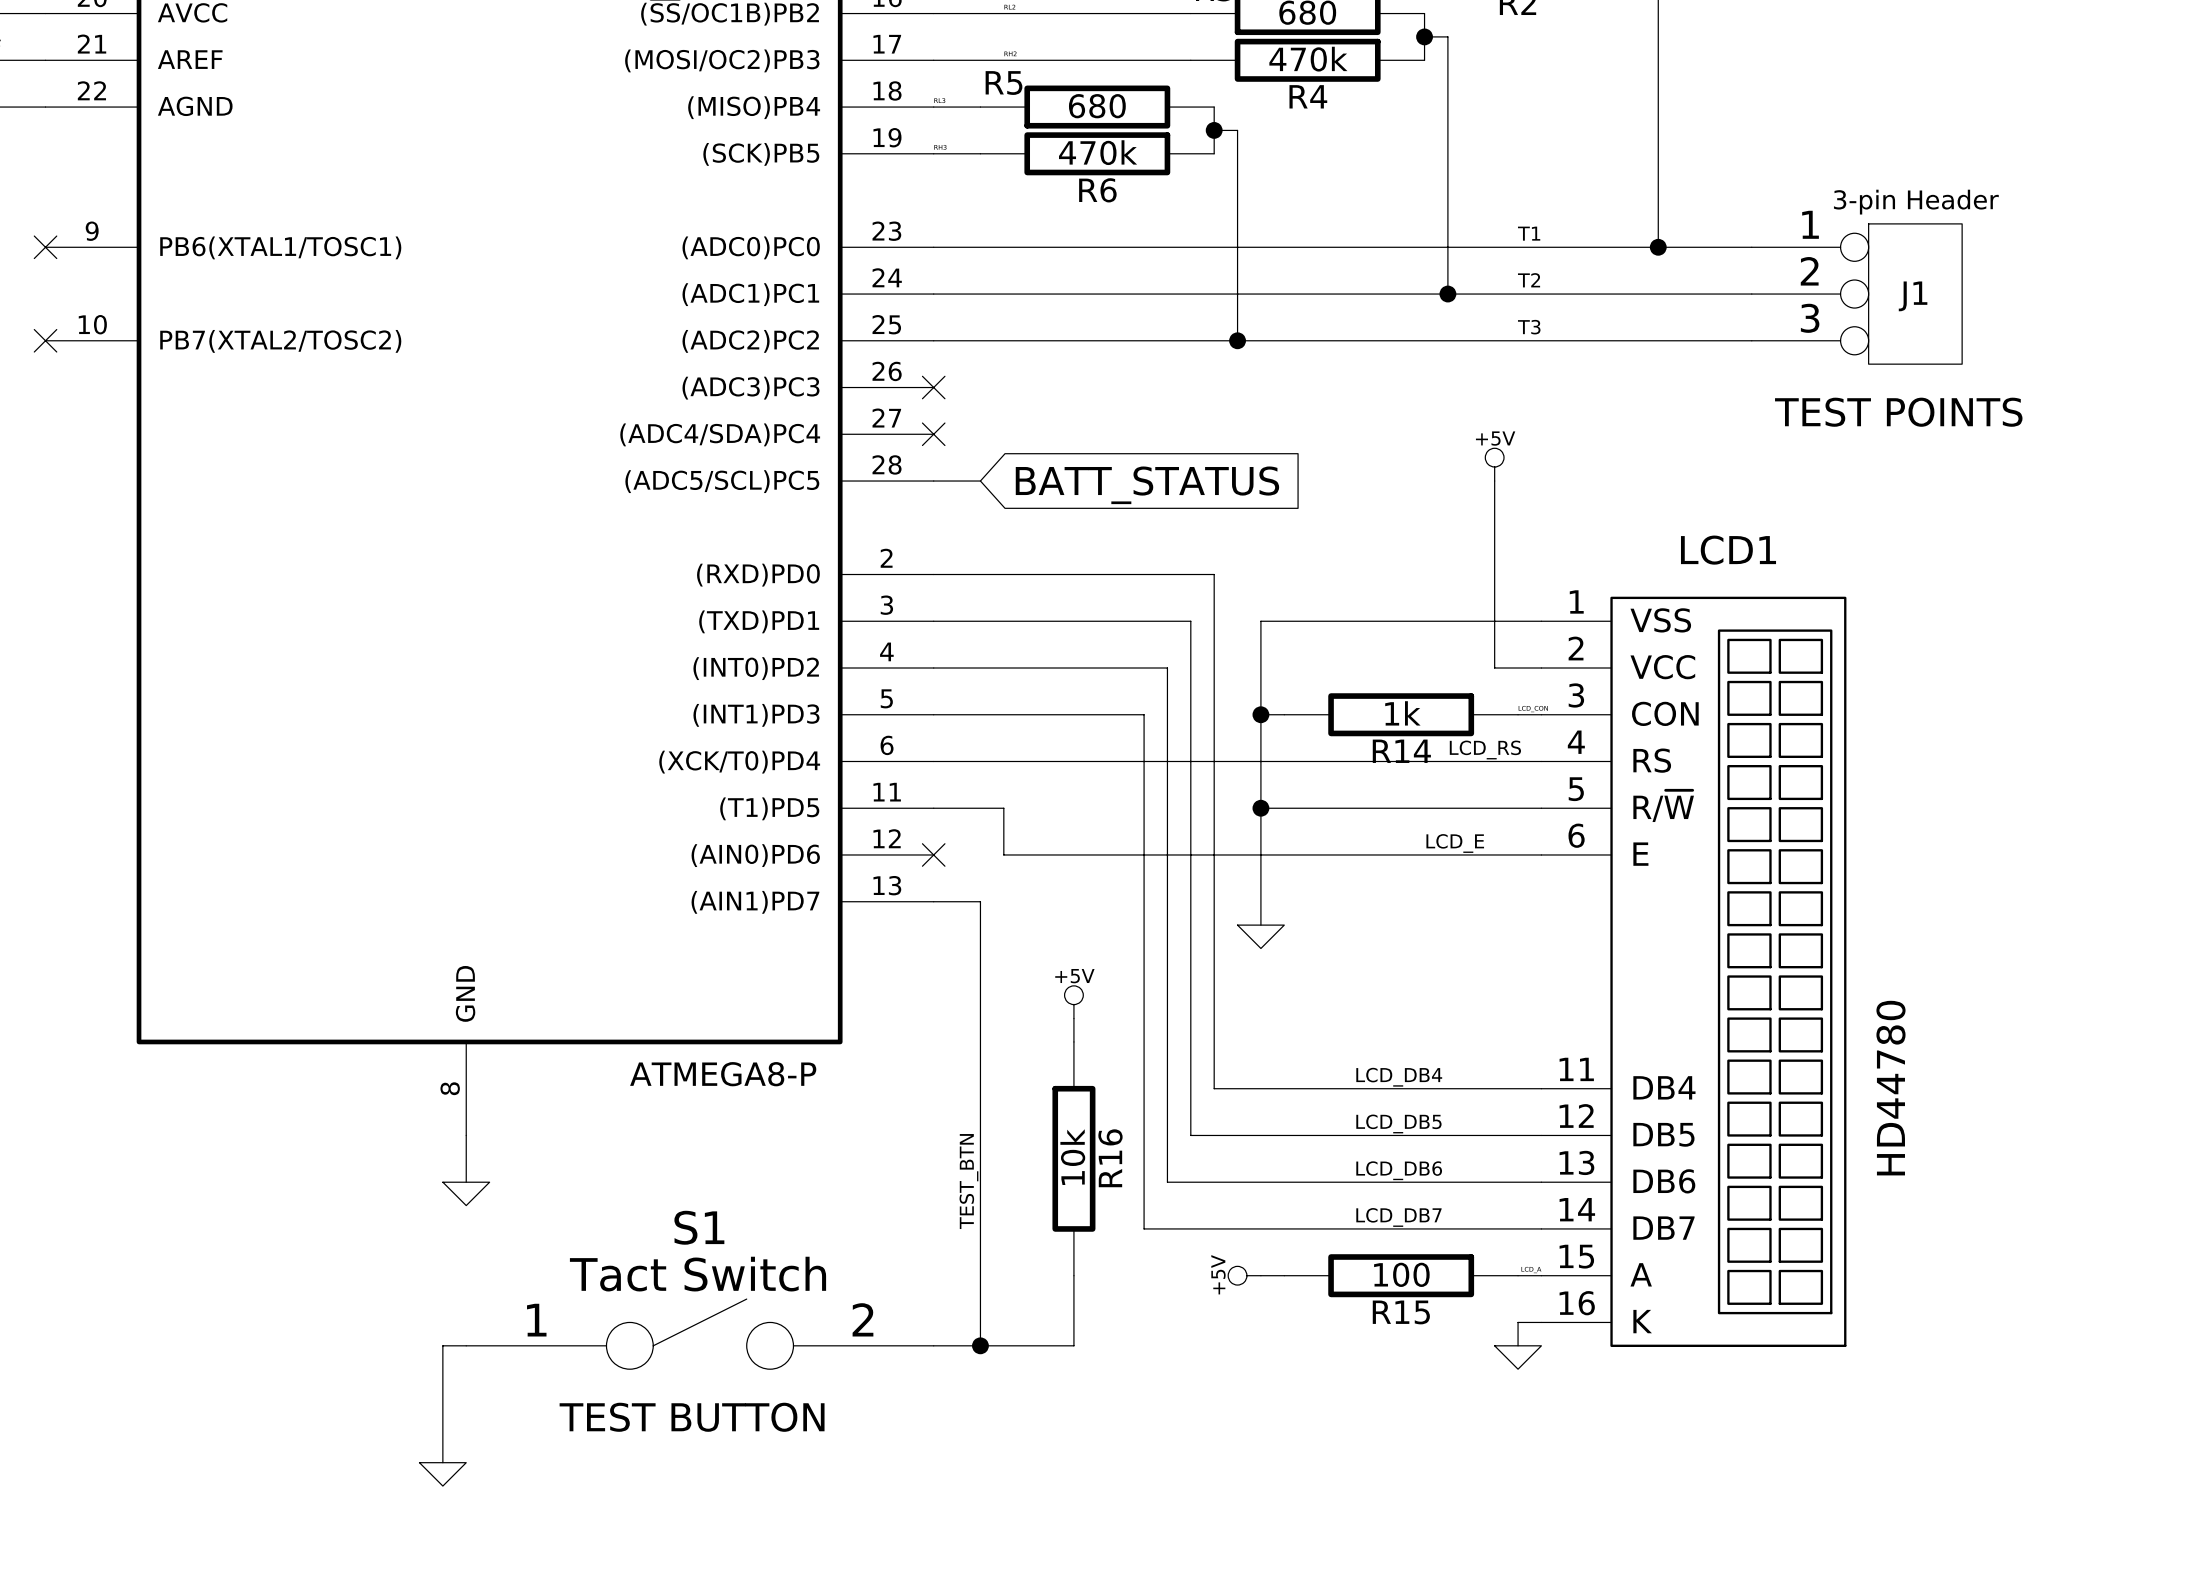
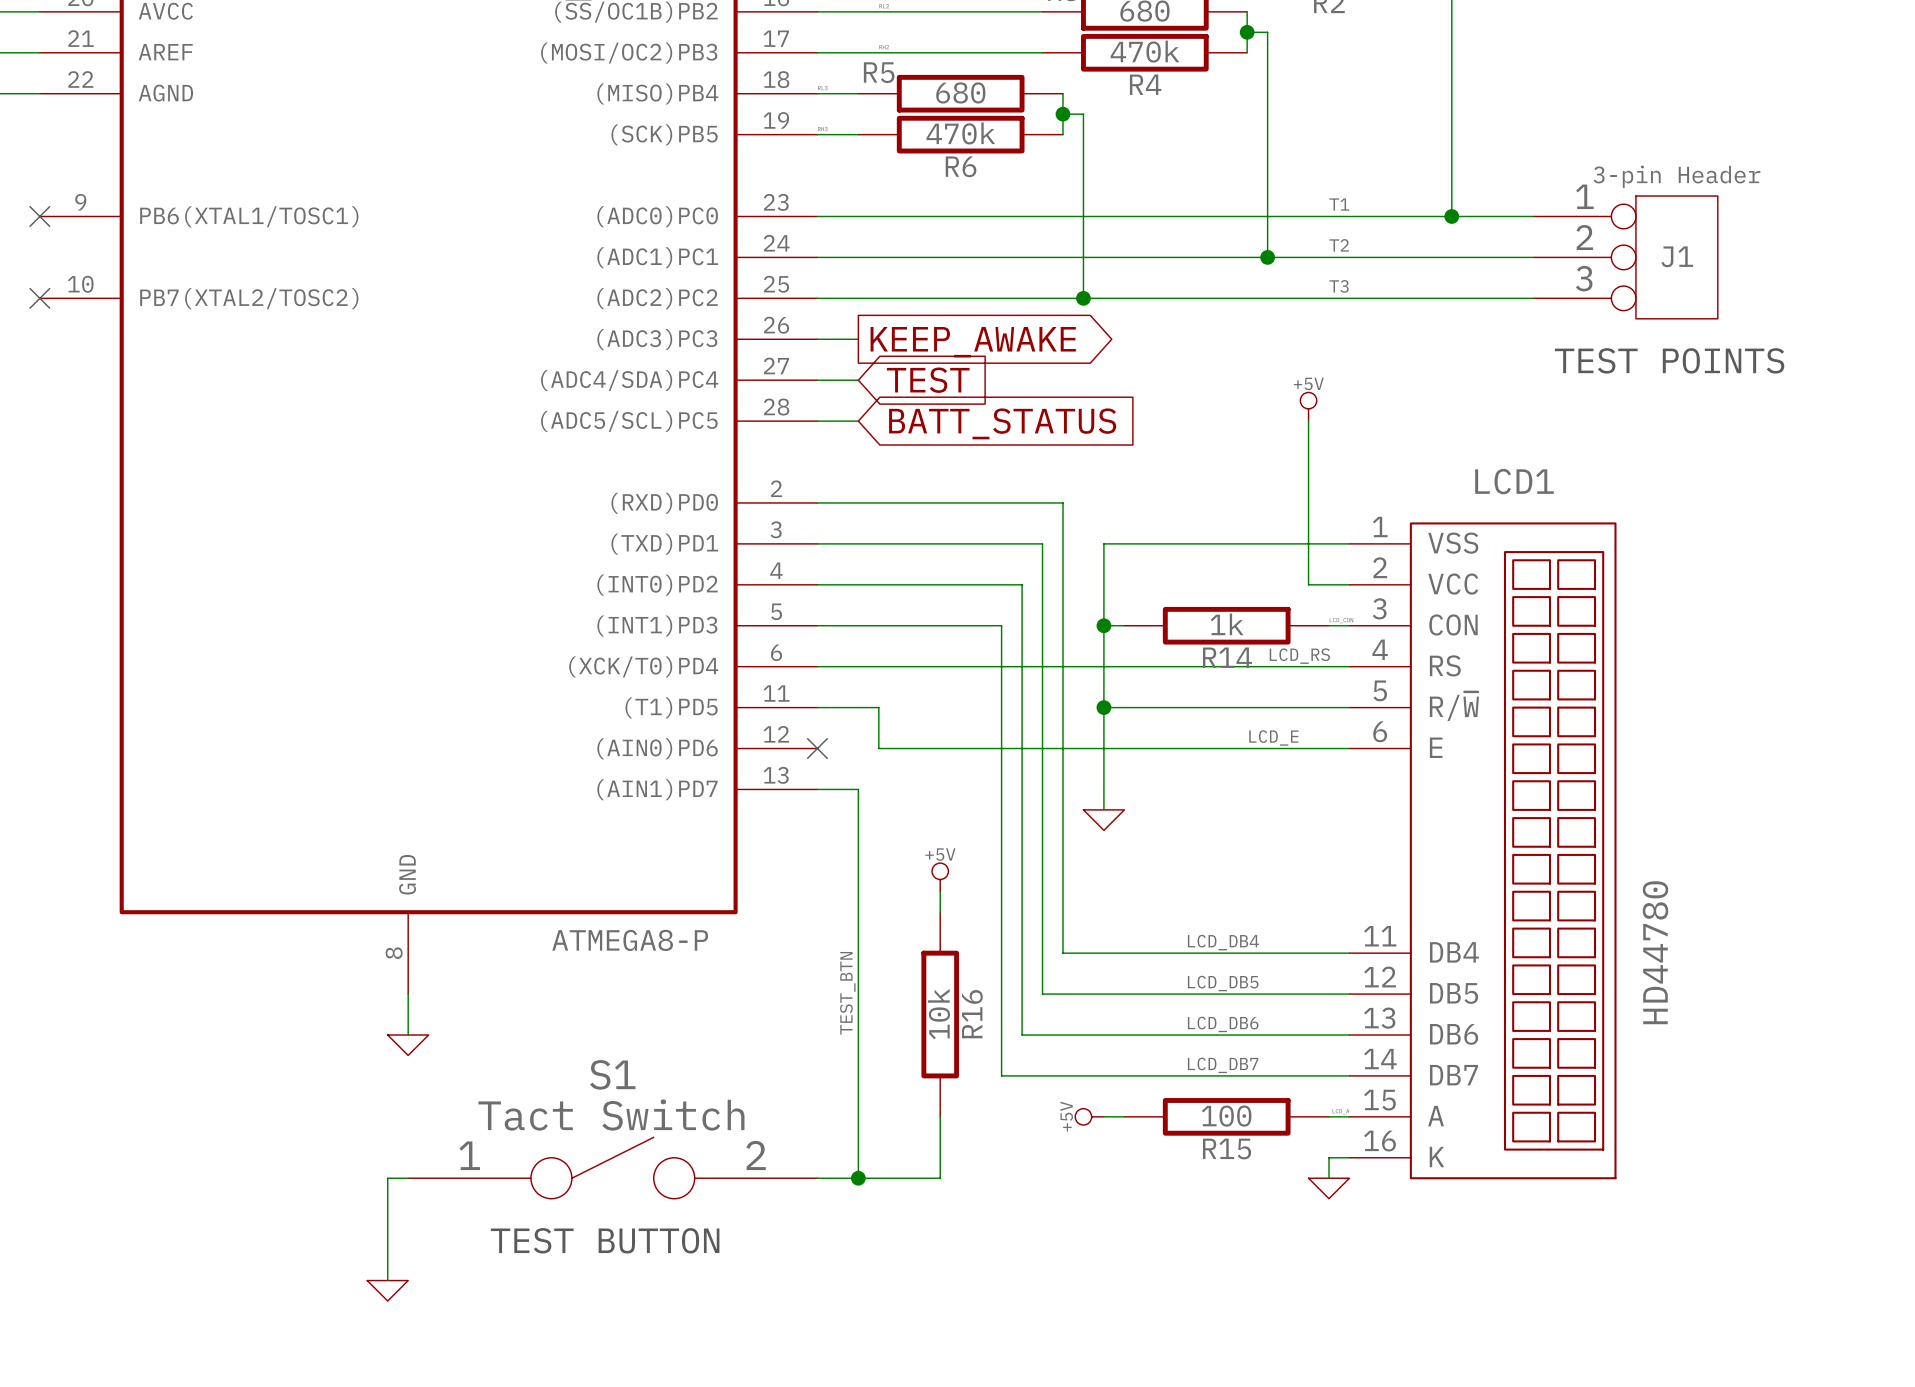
wire: none -> (817, 339) (858, 339)
no-connect mark: (933, 387) -> none
global label: none -> KEEP_AWAKE (973, 342)
wire: none -> (817, 380) (858, 380)
no-connect mark: (933, 434) -> none
global label: none -> TEST (928, 380)
label position: TEST_BTN (968, 1181) -> TEST_BTN (847, 993)

